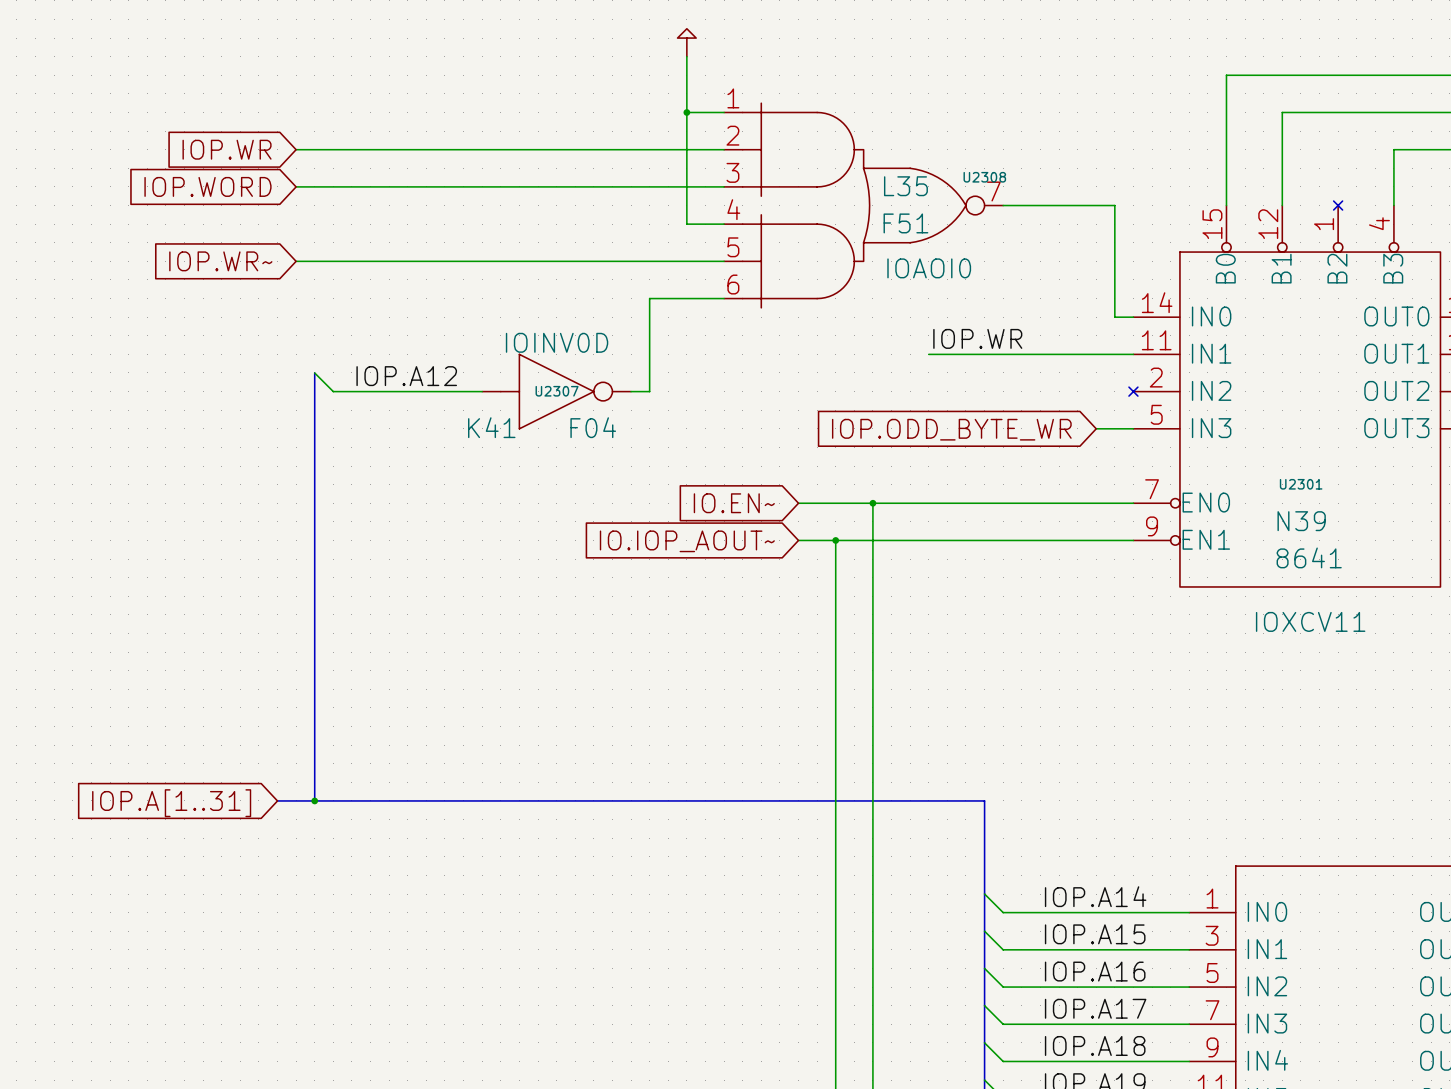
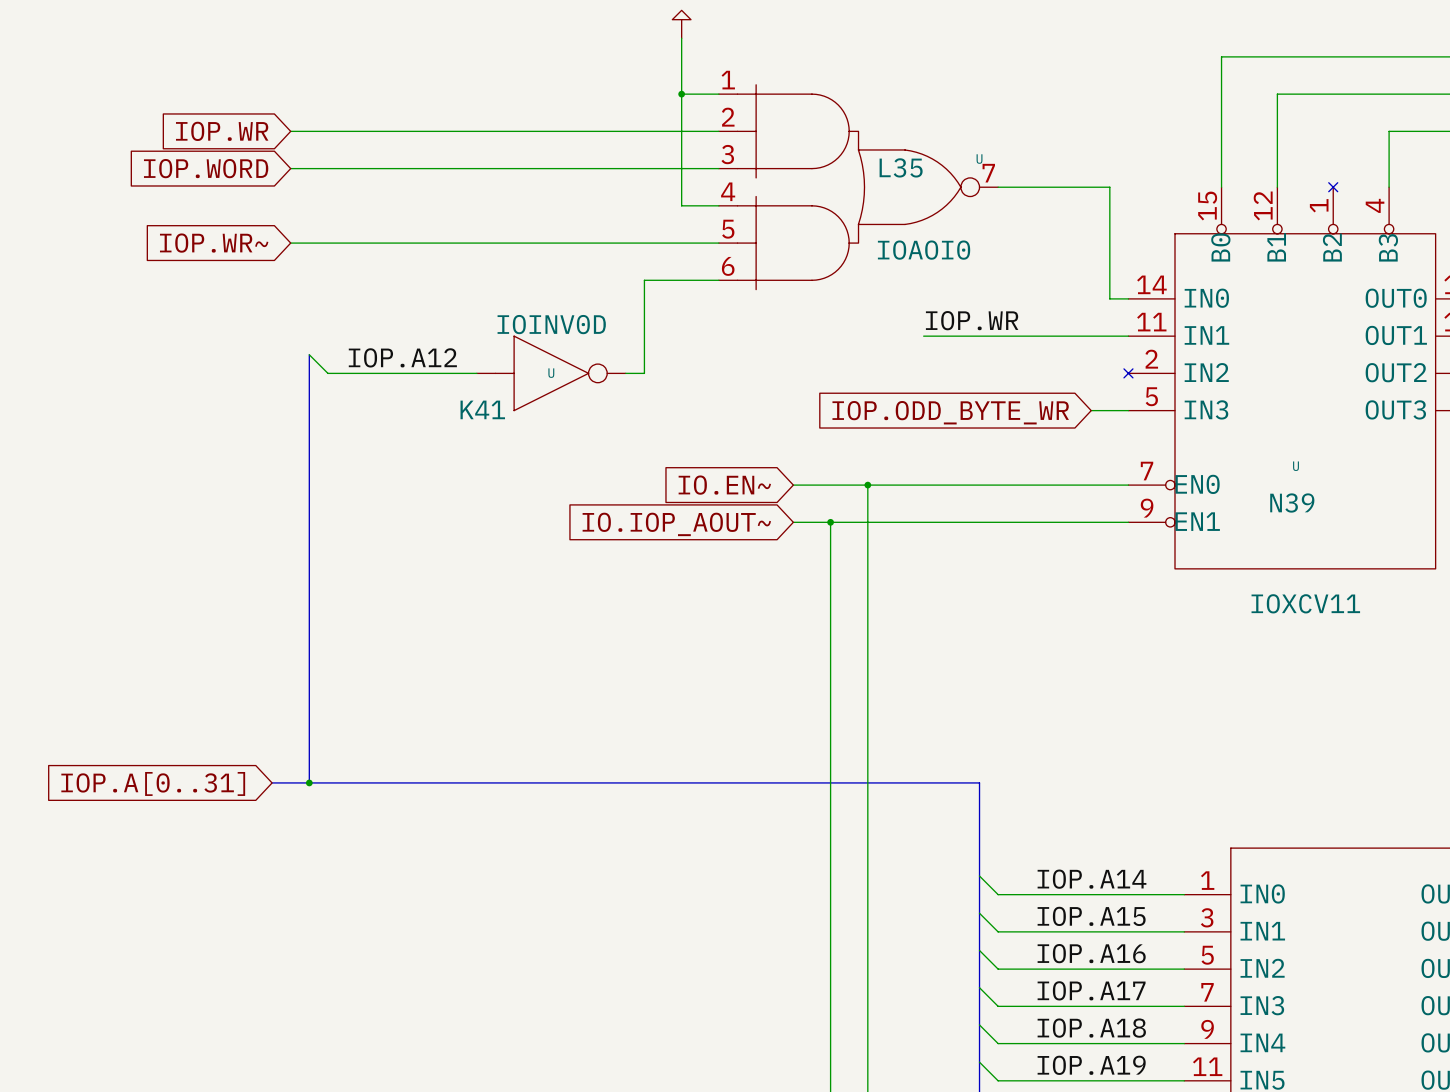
U2308 name: U2308 (984, 177) -> U (979, 159)
U2308 value: F51 (905, 223) -> none
U2307 name: U2307 (557, 391) -> U (551, 373)
U2307 value: F04 (593, 427) -> none
U2301 name: U2301 (1301, 484) -> U (1296, 466)
U2301 value: 8641 (1309, 557) -> none
global label: IOP.A[1..31] (171, 803) -> IOP.A[0..31] (153, 783)

